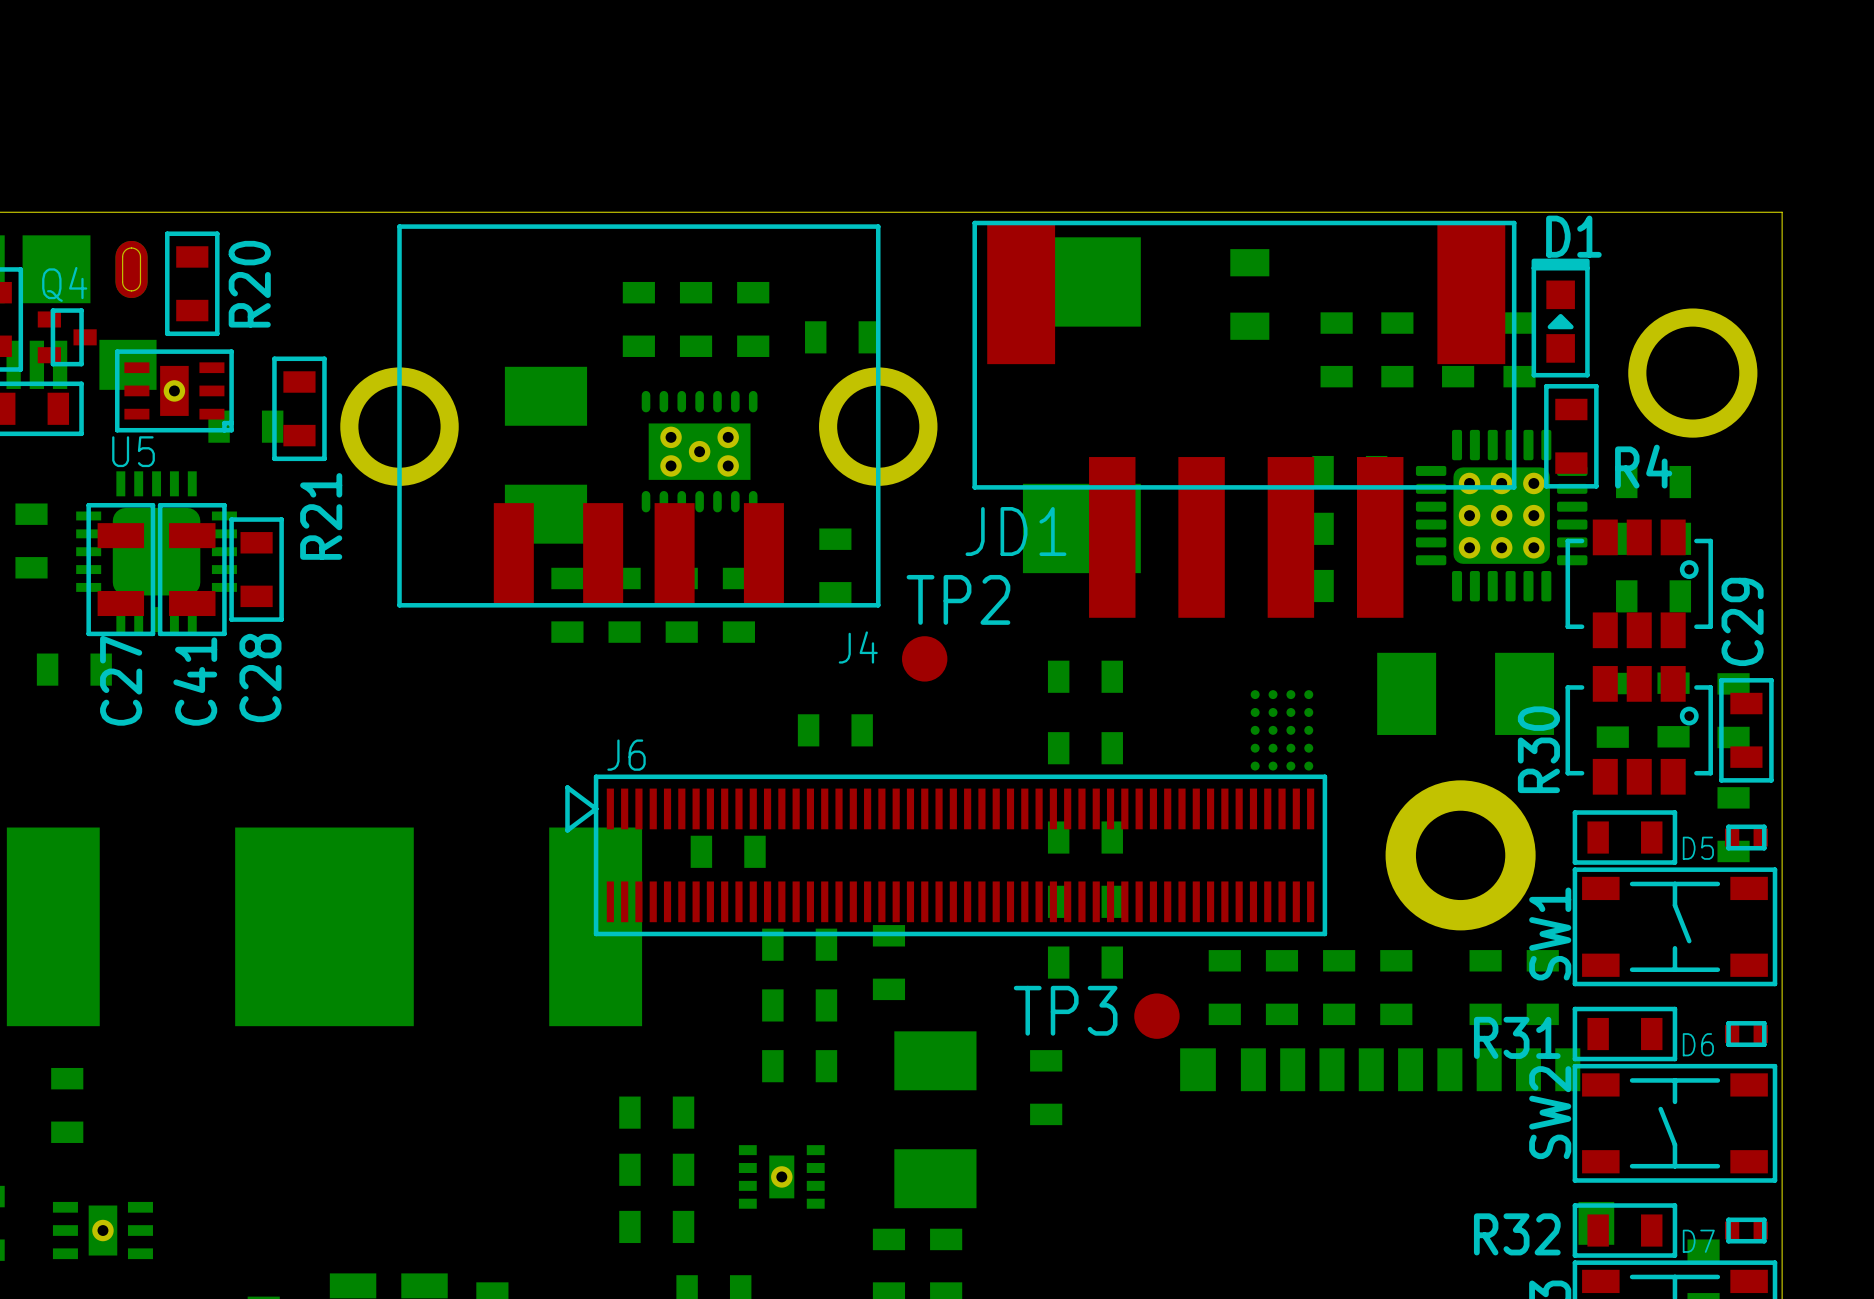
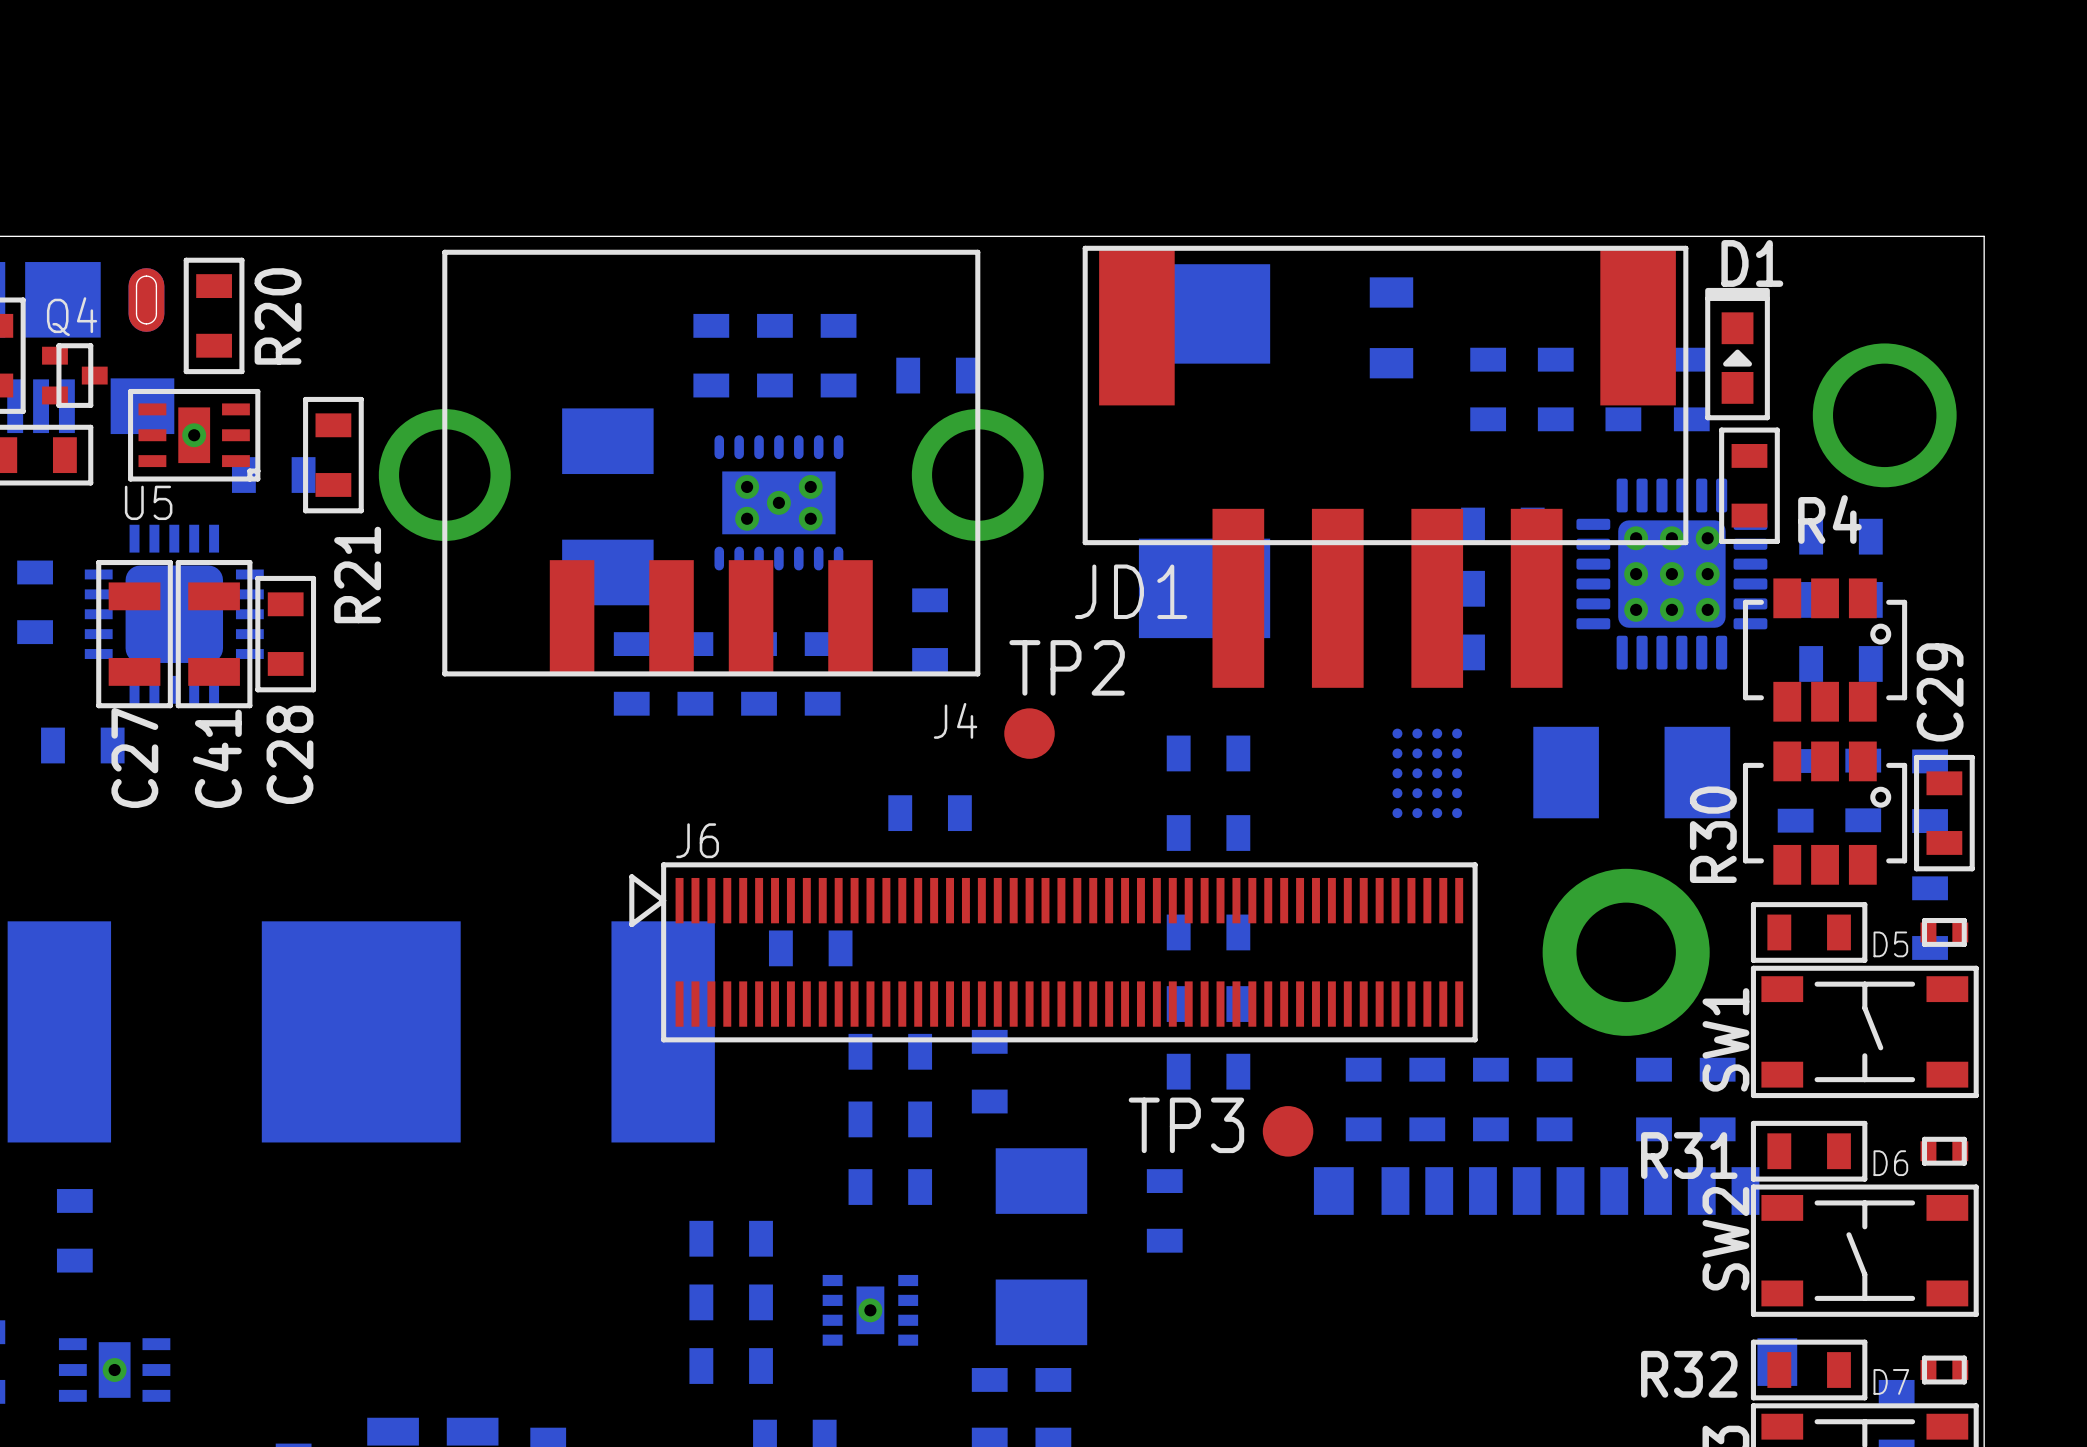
part position: (1281, 730) -> (1427, 773)

